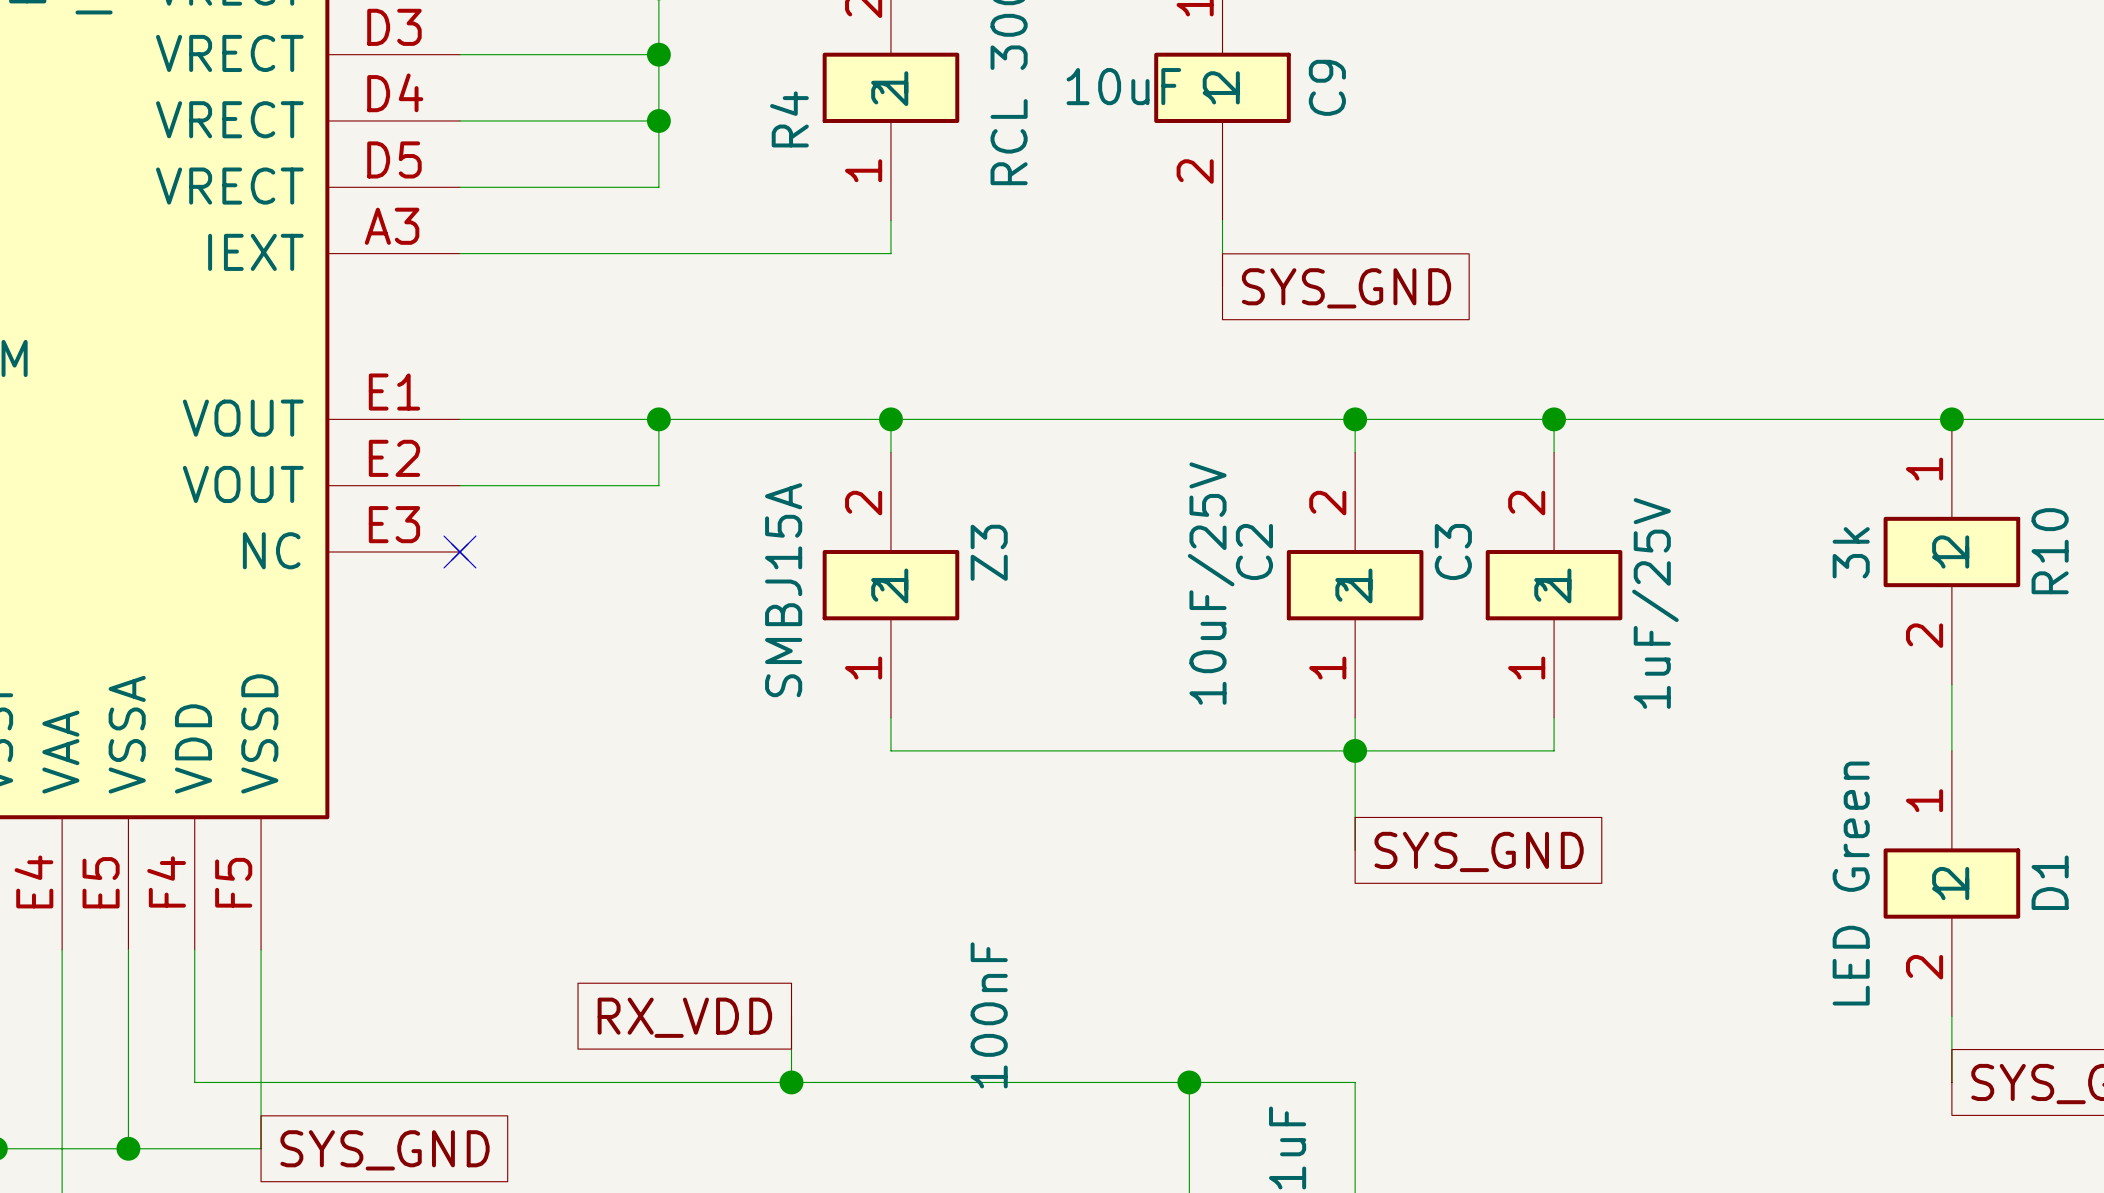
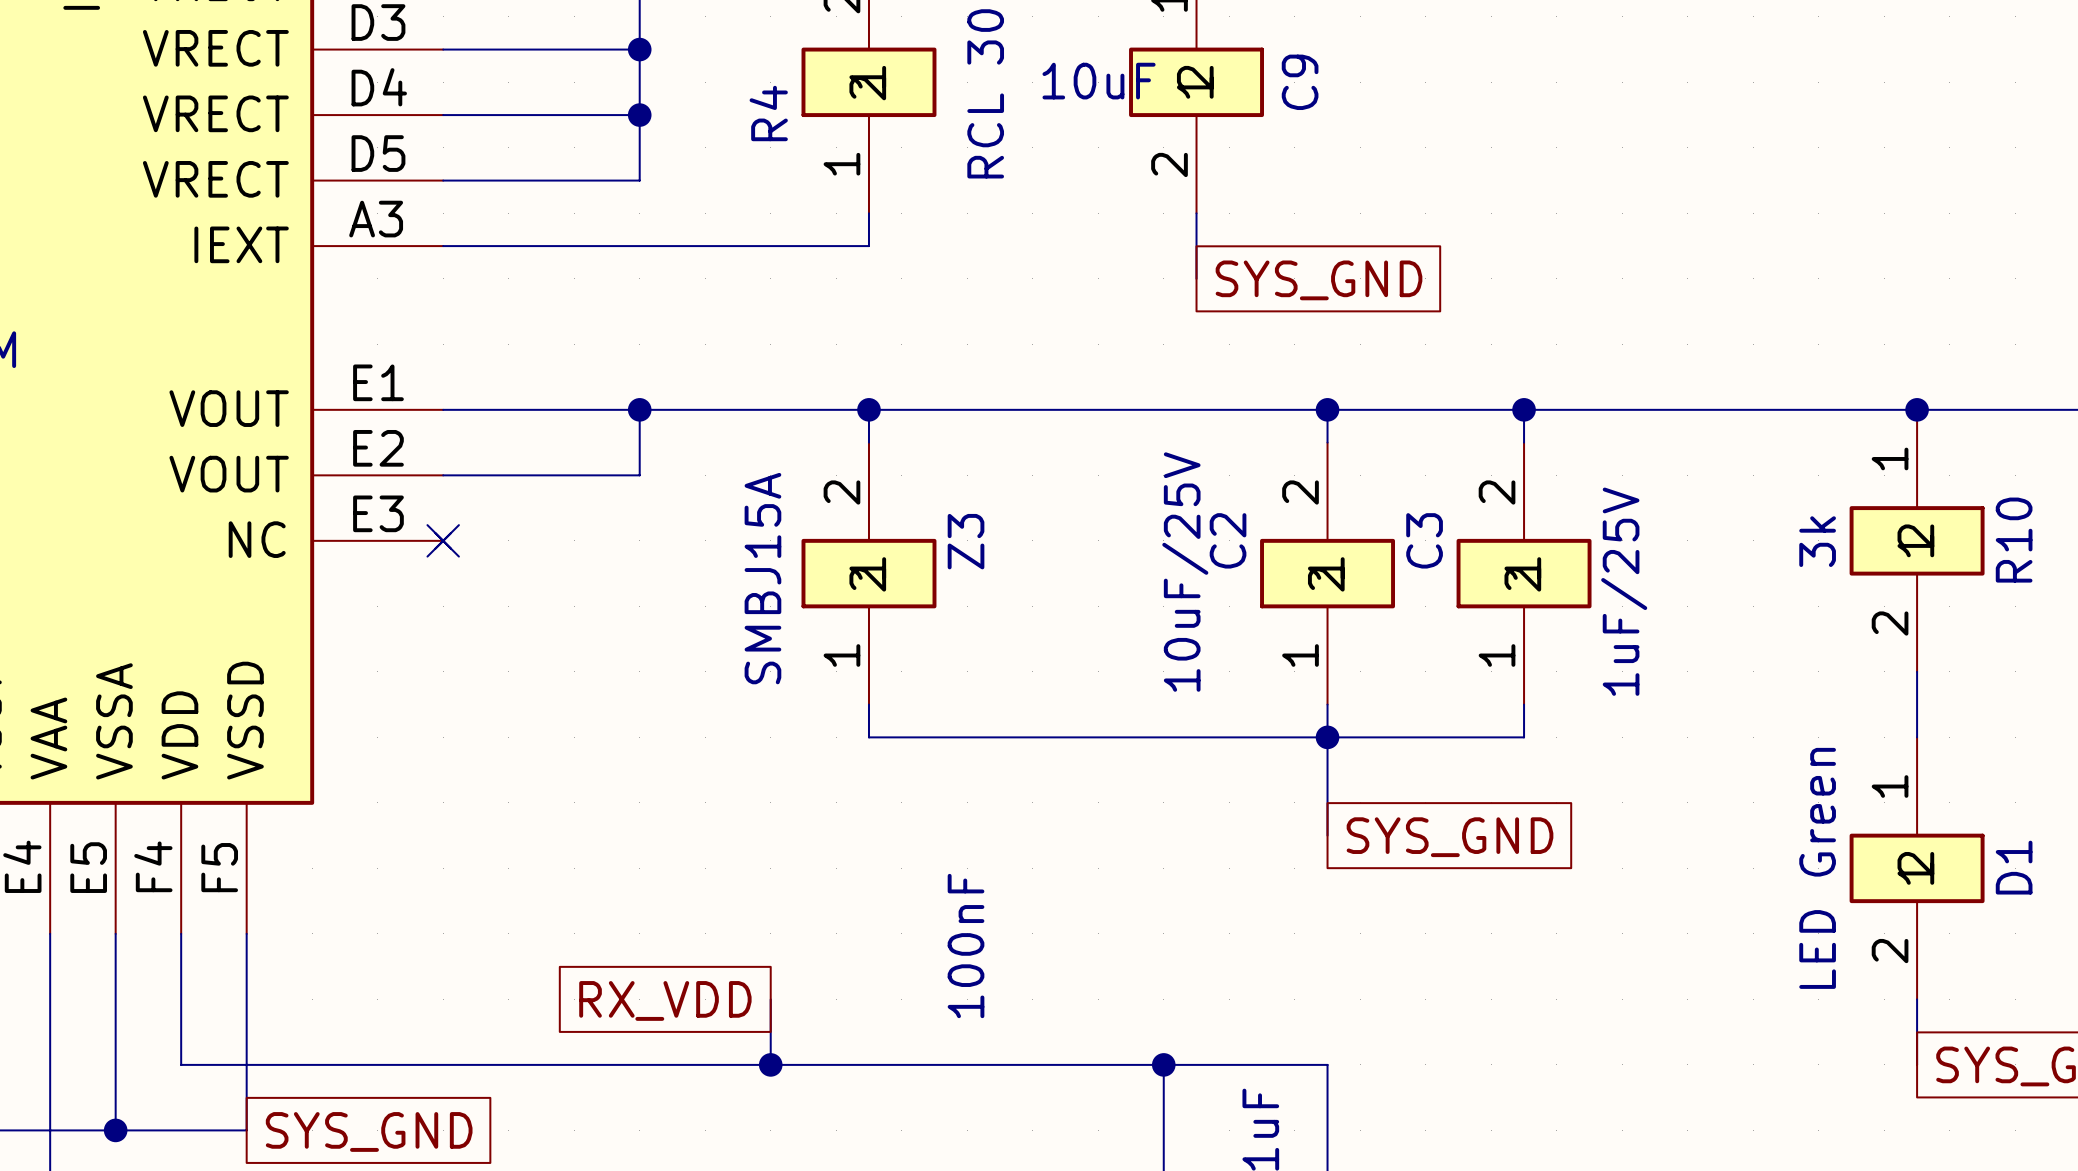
part value position: 100nF (989, 1015) -> 100nF (966, 946)

